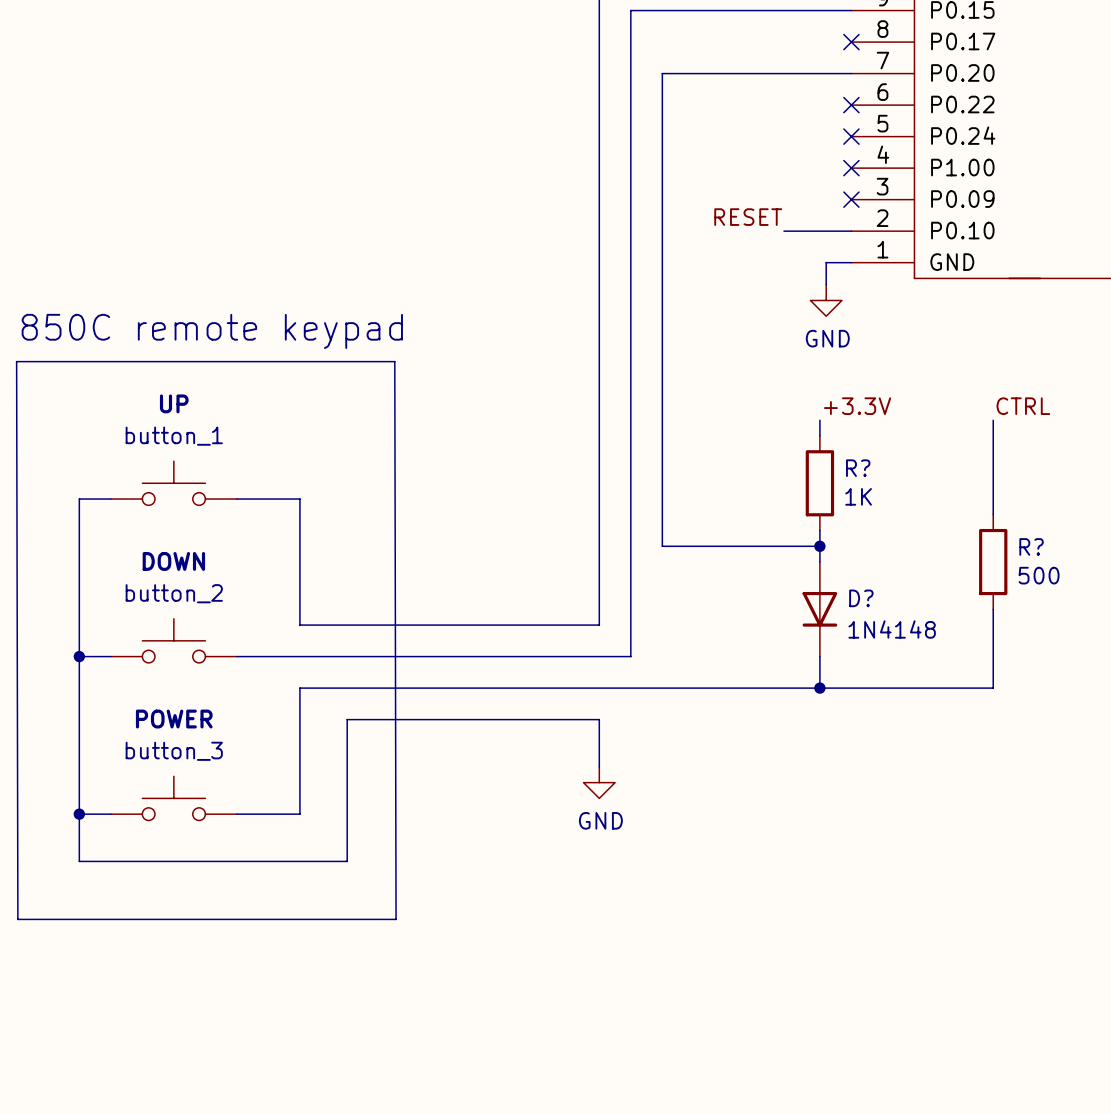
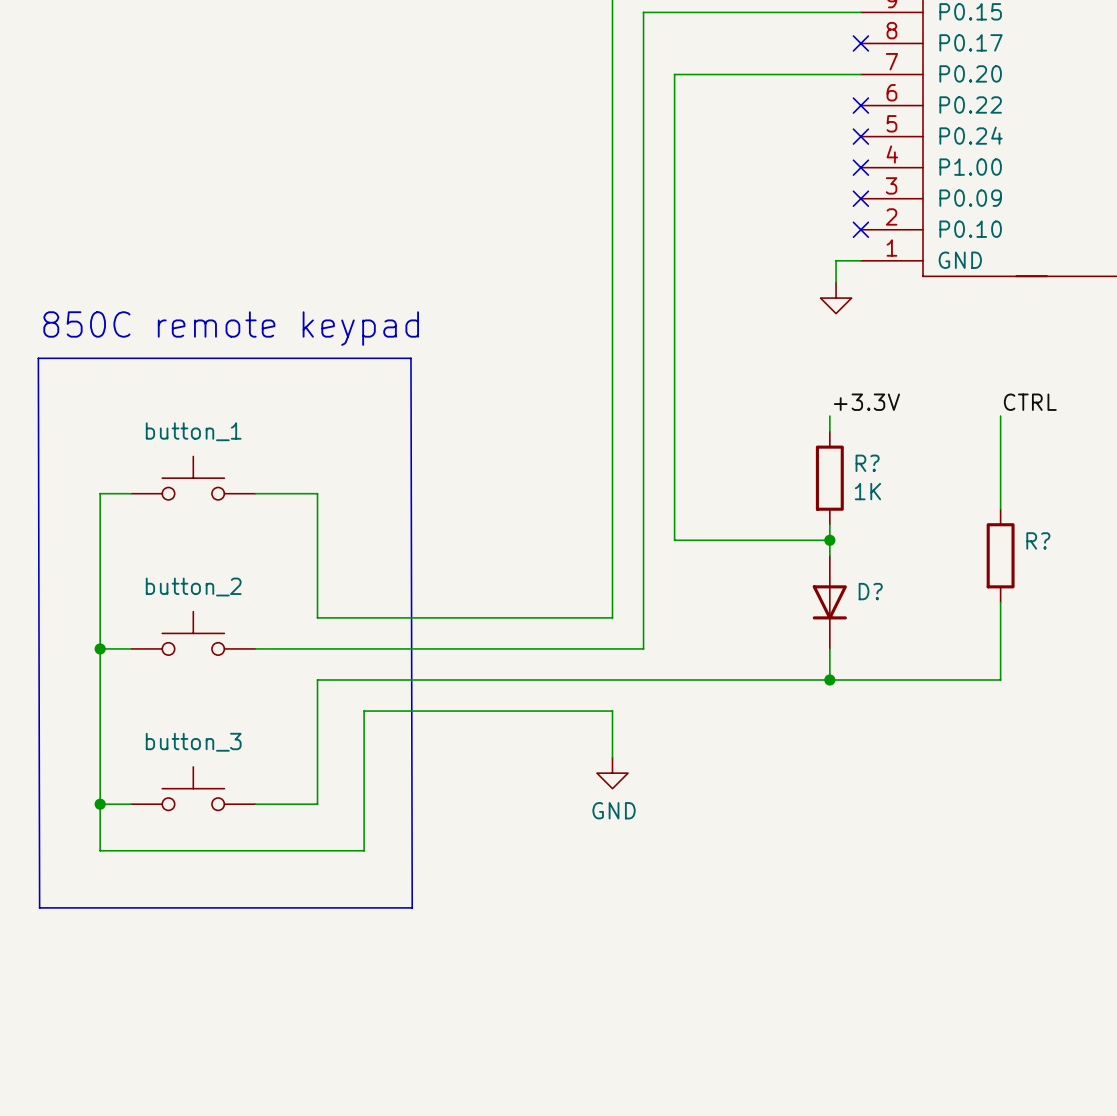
label: RESET (748, 217) -> none
wire: (783, 231) (851, 231) -> none
no-connect mark: none -> (860, 229)
power symbol text: GND (827, 338) -> none
button_1 value: UP (174, 403) -> none
button_2 value: DOWN (173, 561) -> none
R? value: 500 (1039, 575) -> none
D? value: 1N4148 (892, 629) -> none
button_3 value: POWER (174, 719) -> none

